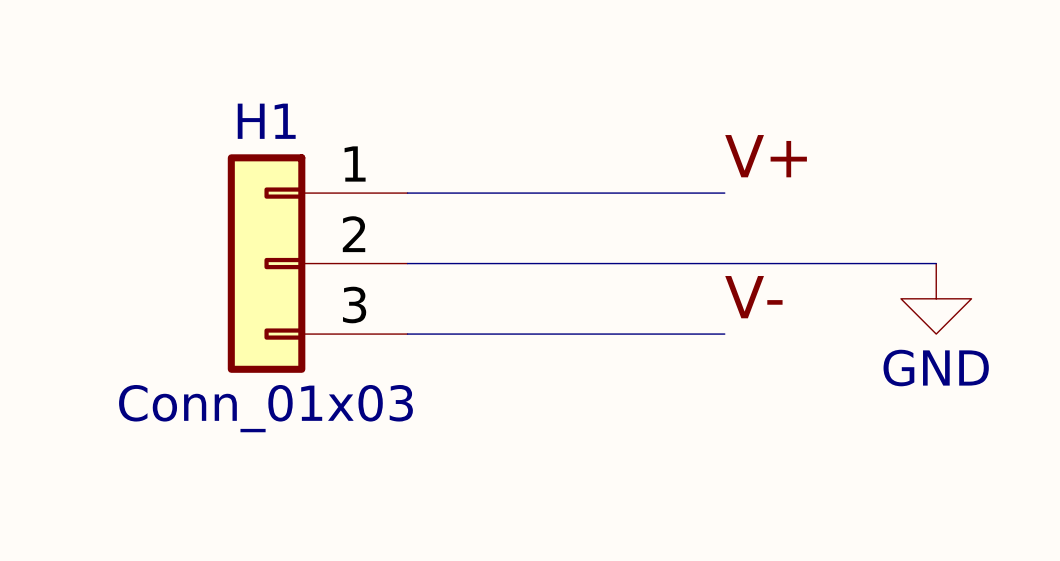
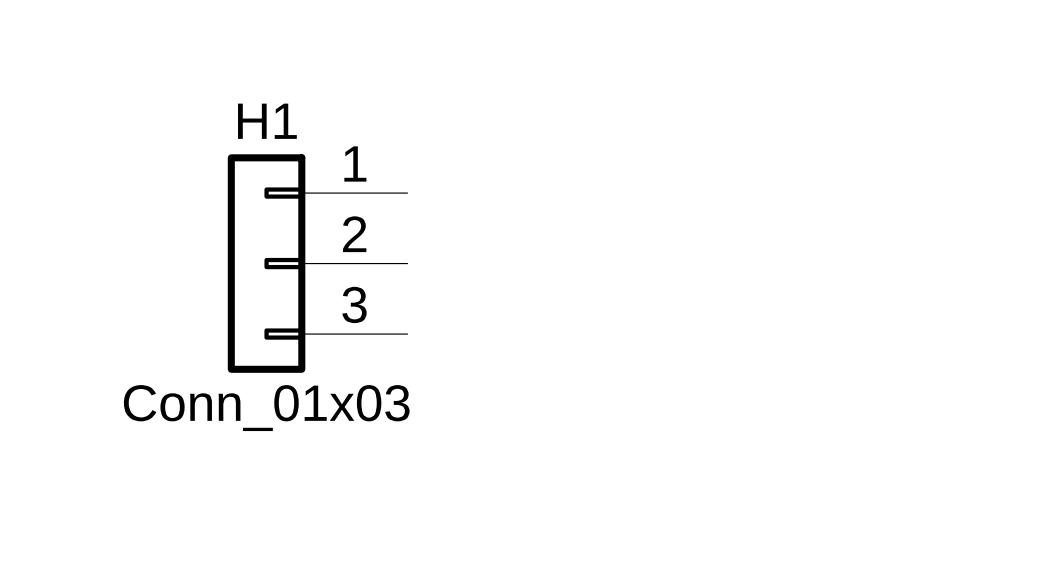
label: V+ (766, 156) -> none
wire: (407, 193) (724, 193) -> none
wire: (407, 263) (936, 263) -> none
label: V- (753, 297) -> none
power symbol: GND (936, 298) -> none
wire: (407, 334) (724, 334) -> none

